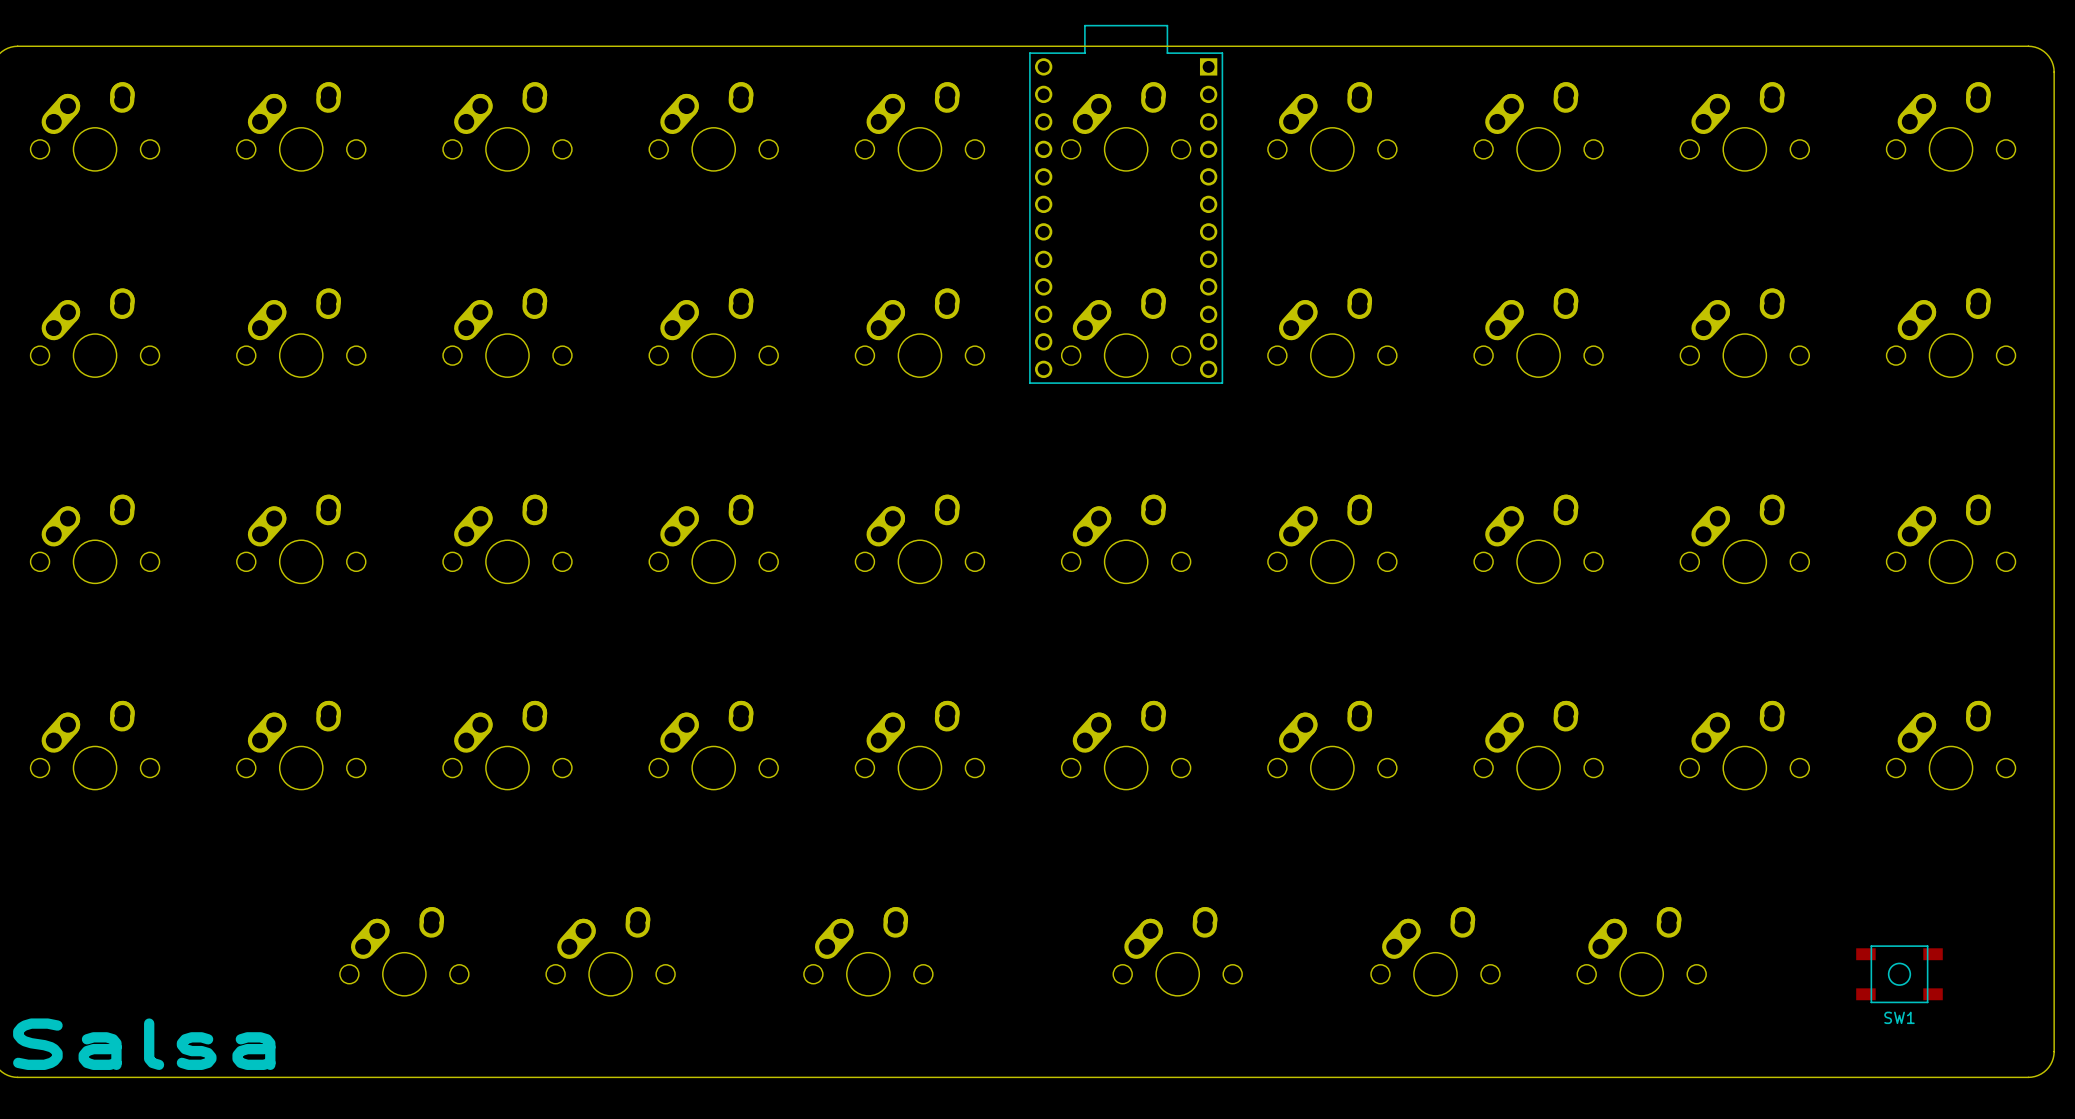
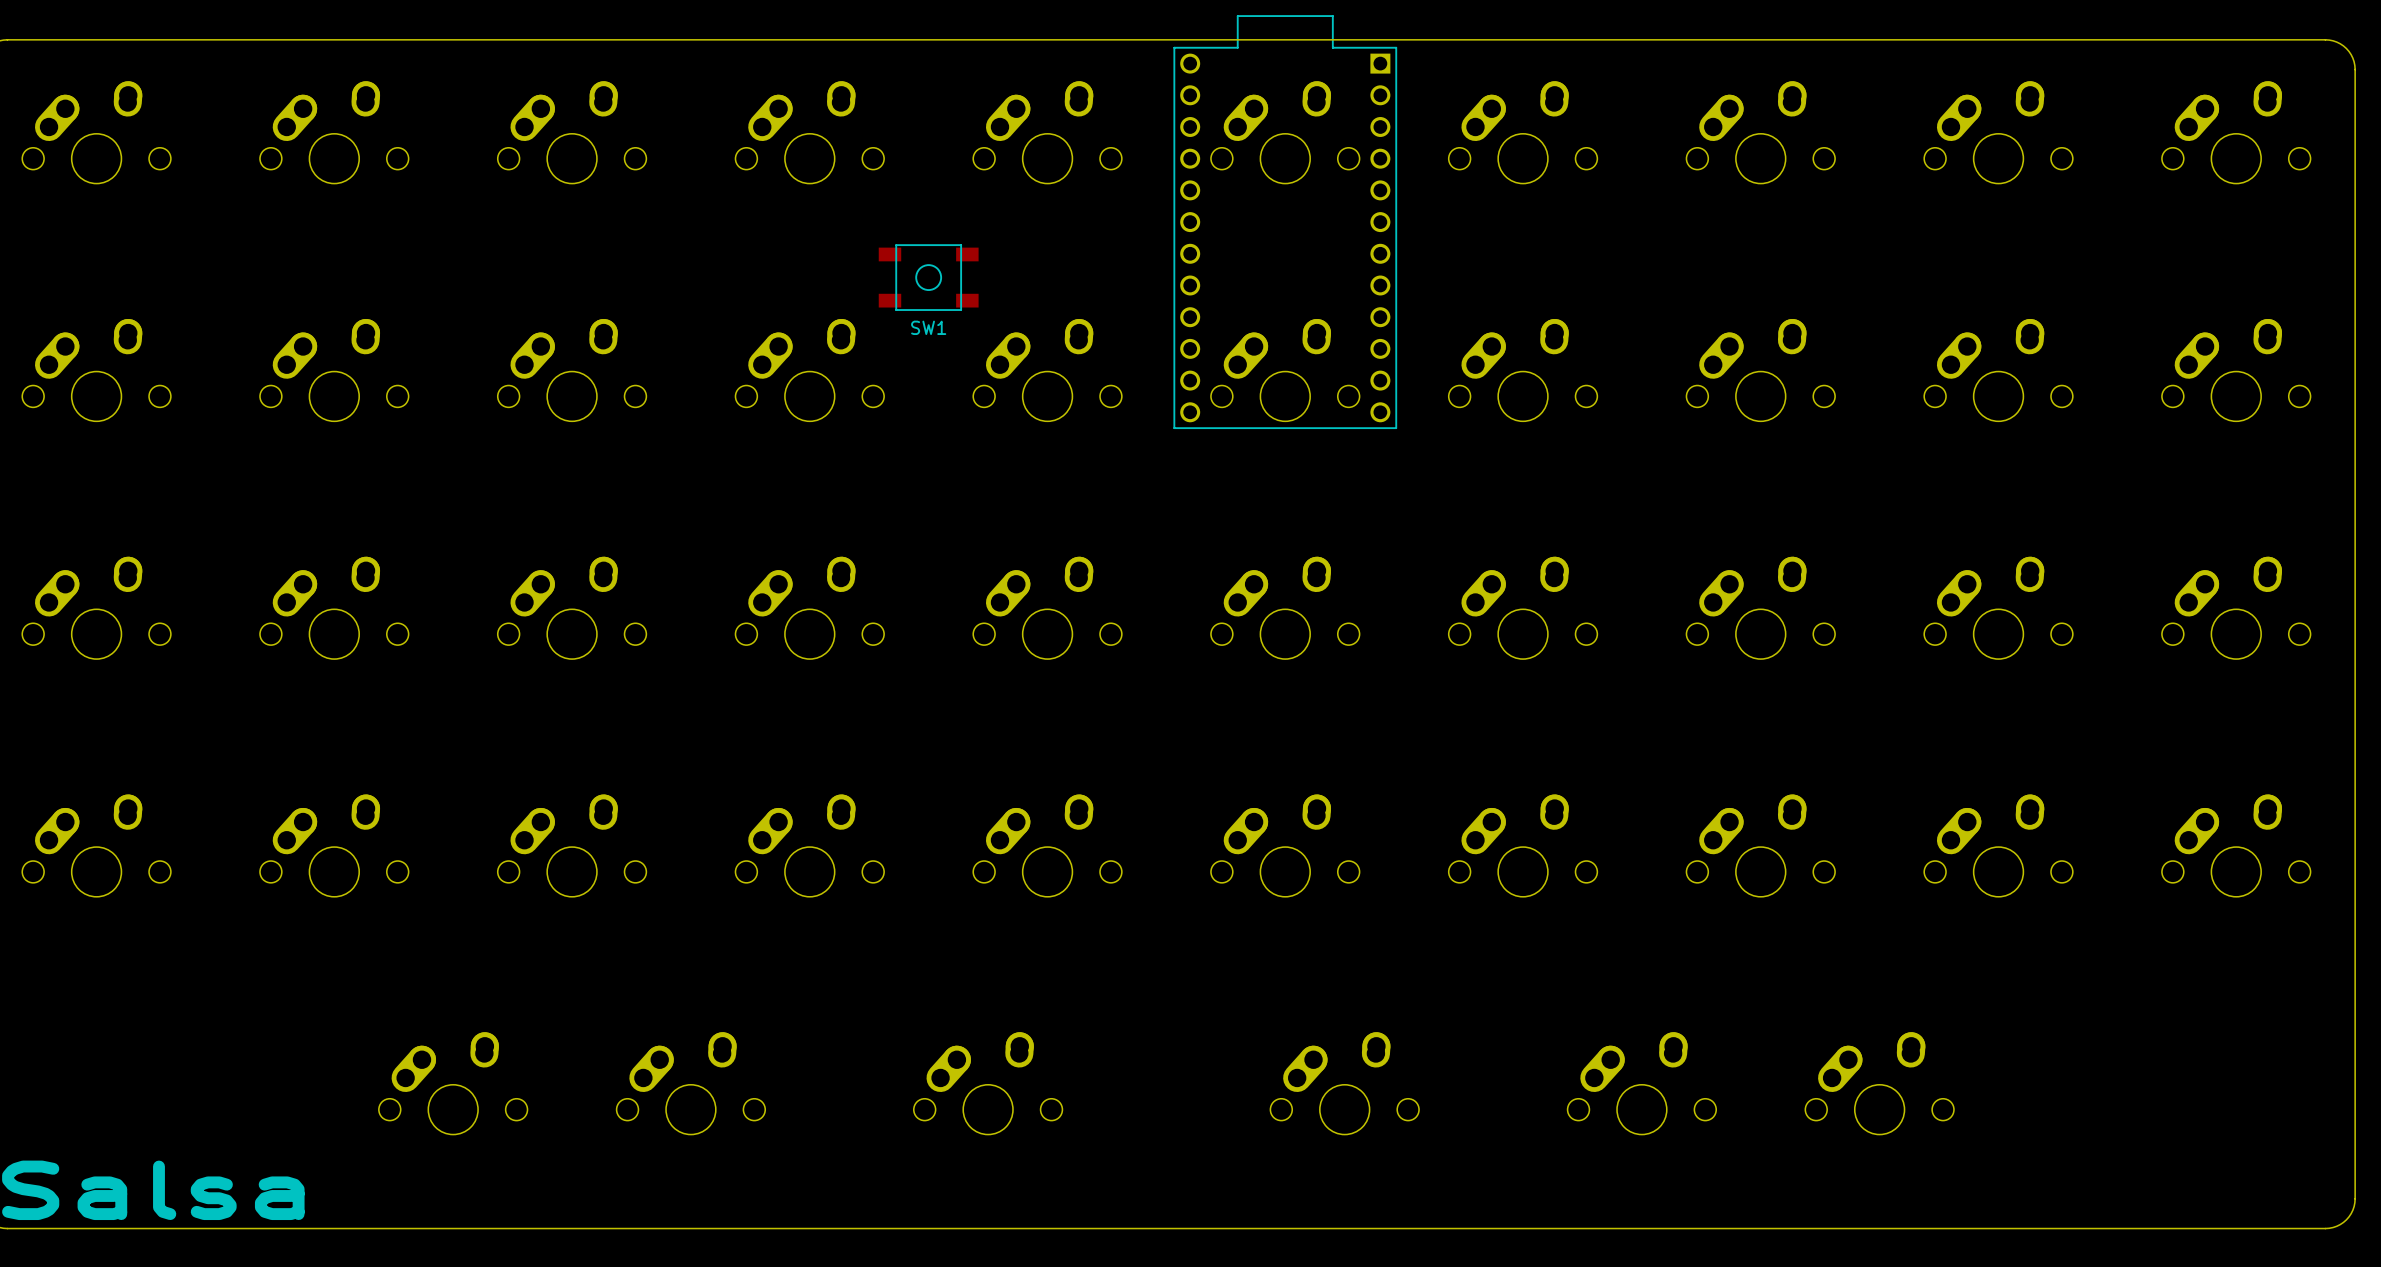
SW1 position: (1899, 974) -> (928, 277)

